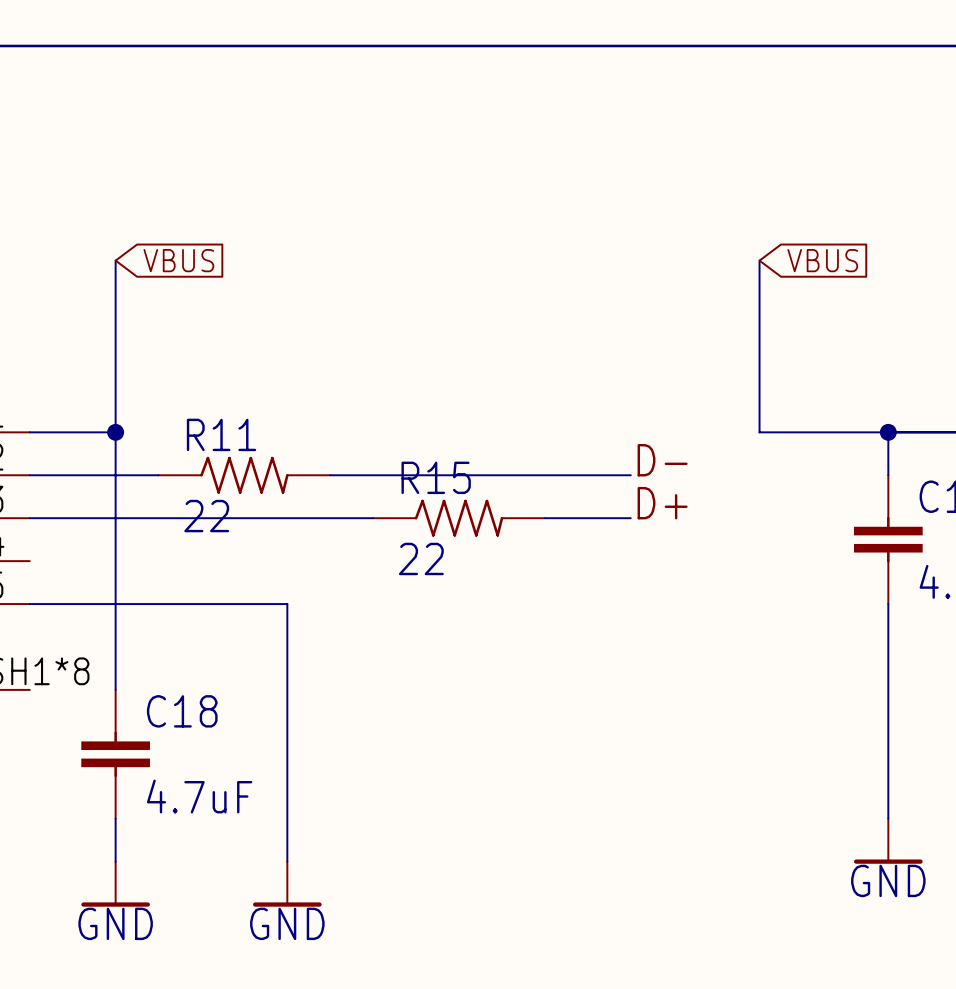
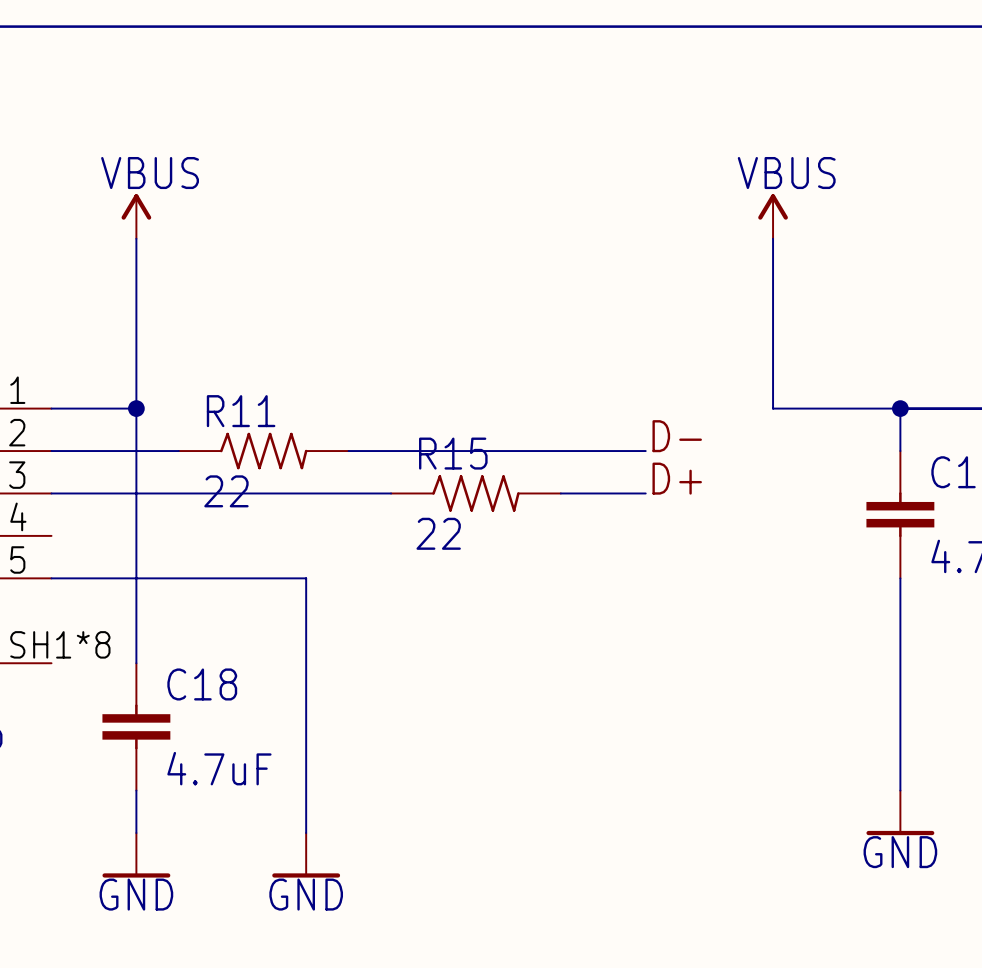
power symbol: none -> VBUS (136, 216)
power symbol: none -> VBUS (773, 216)
global label: VBUS (178, 260) -> none
global label: VBUS (822, 260) -> none

